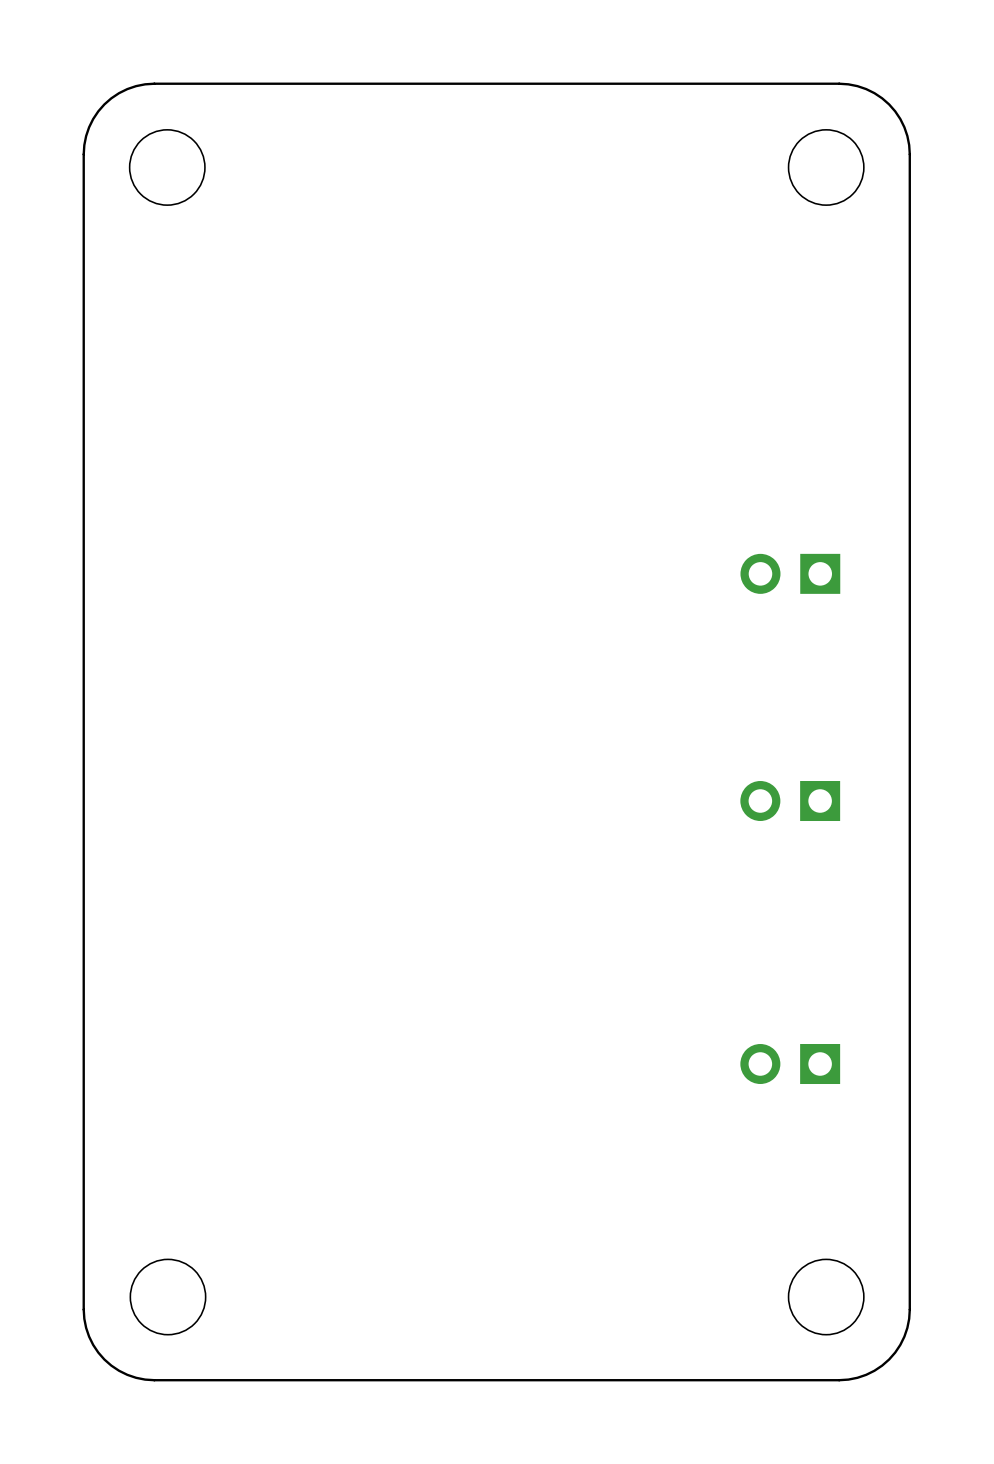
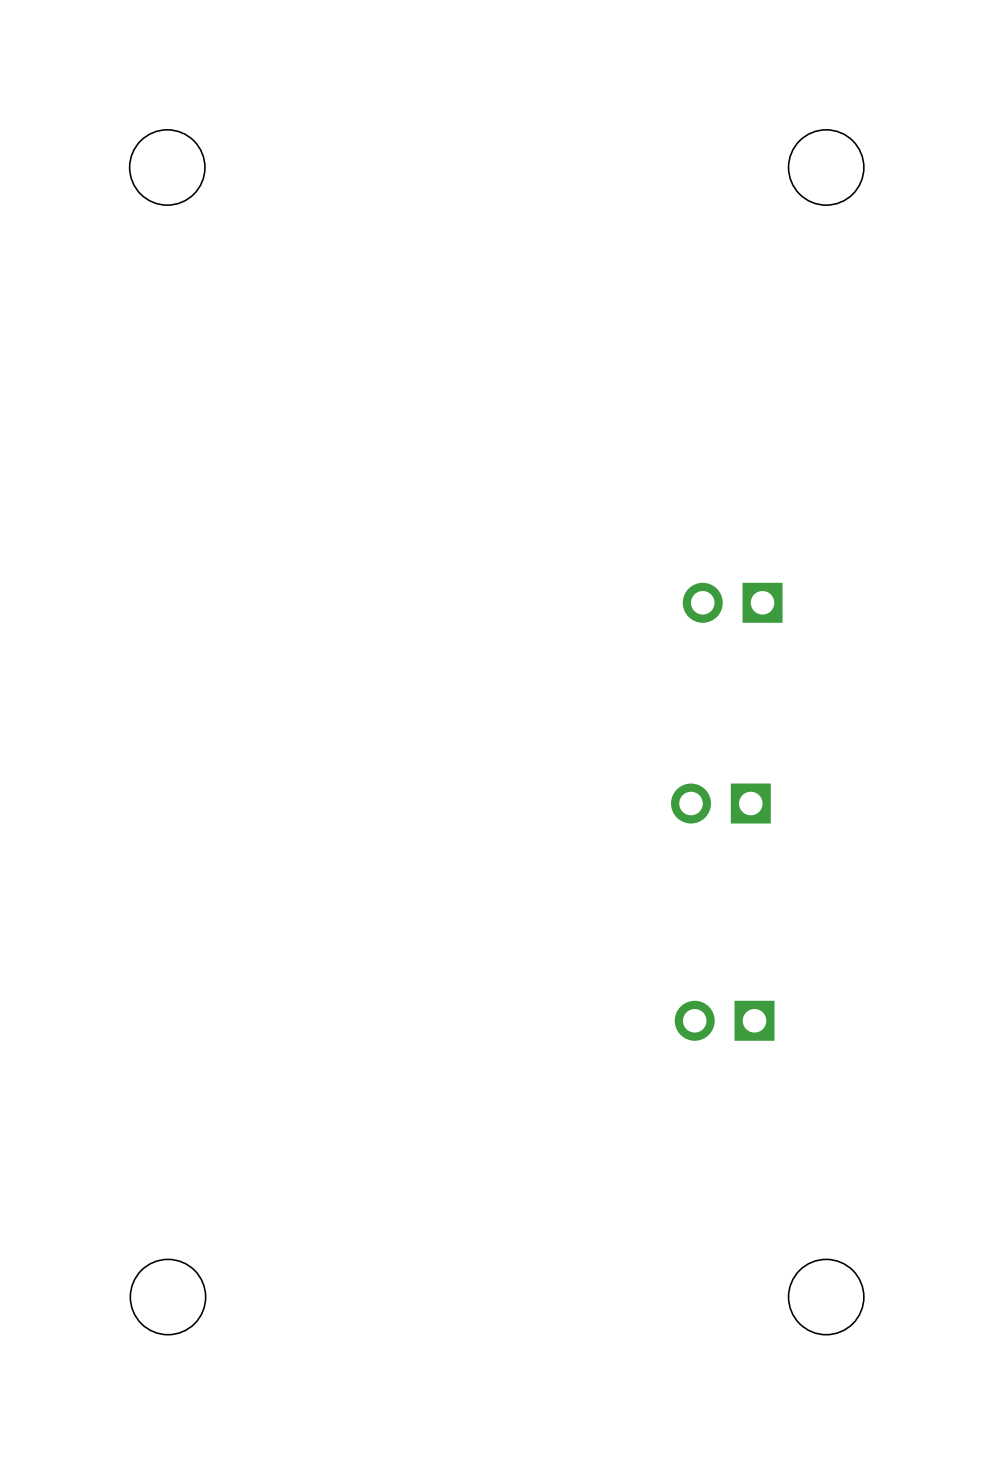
board edge: (839, 83) (154, 83) (136, 86) (119, 93) (104, 104) (93, 119) (86, 136) (83, 154) (83, 1309) (86, 1327) (93, 1344) (104, 1359) (119, 1370) (136, 1377) (154, 1380) (839, 1380) (857, 1377) (874, 1370) (889, 1359) (900, 1344) (907, 1327) (909, 1309) (909, 154) (904, 127) (889, 104) (866, 89) (839, 83) -> none
part position: (790, 573) -> (732, 602)
part position: (790, 801) -> (720, 803)
part position: (790, 1064) -> (724, 1020)

